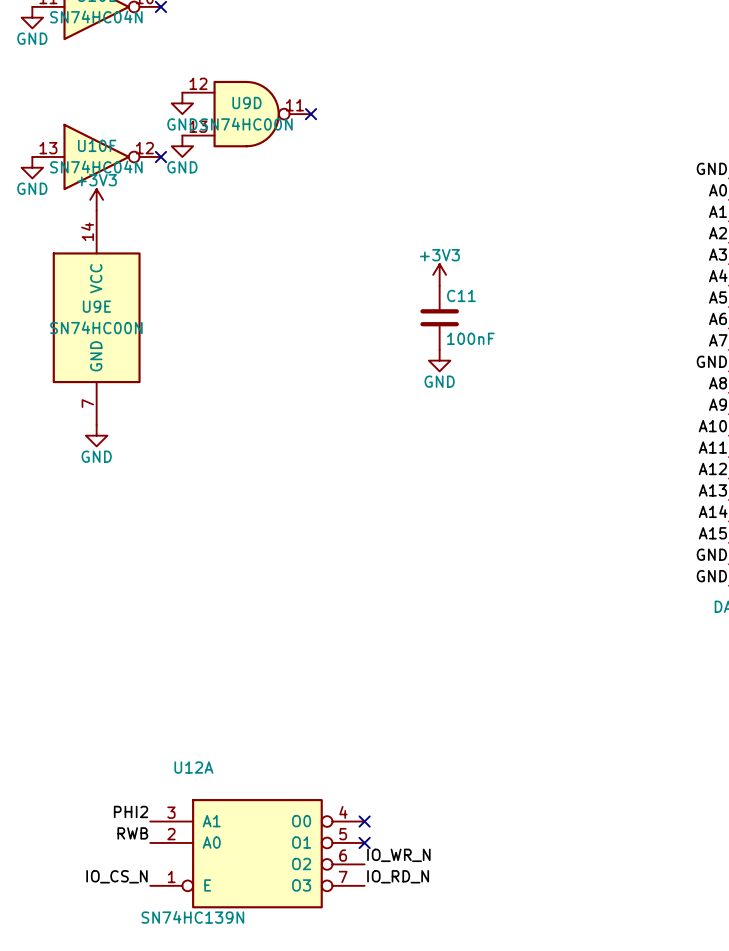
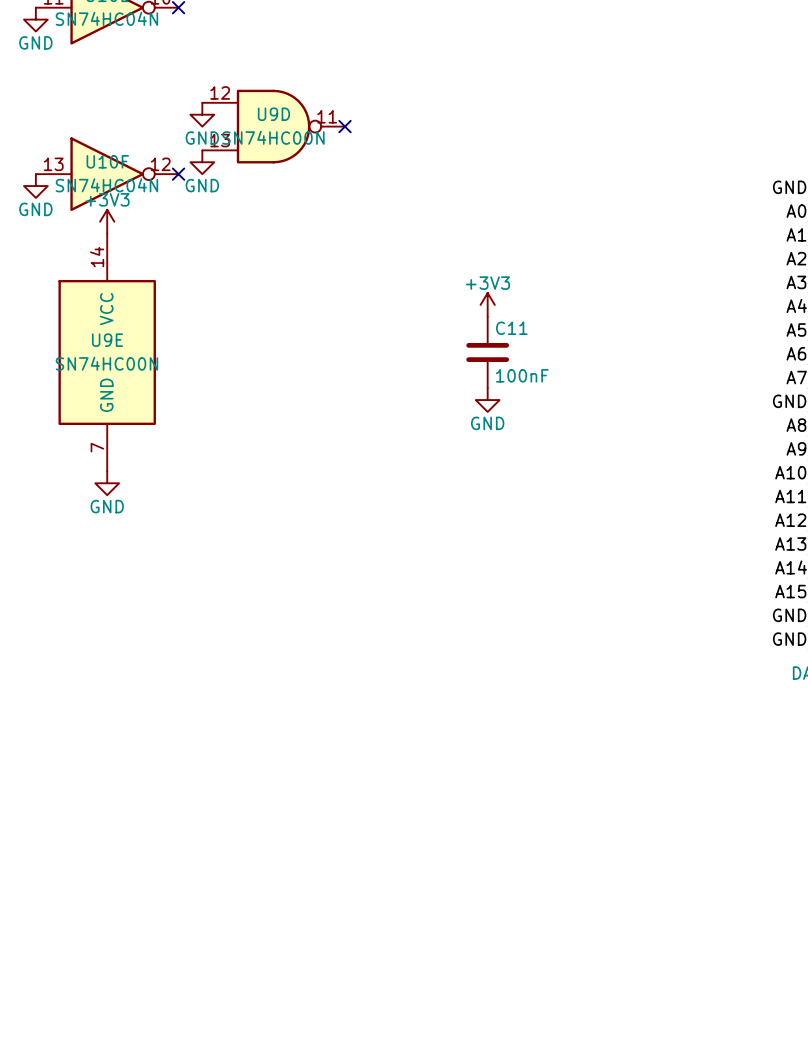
label: PHI2 (131, 811) -> none
no-connect mark: (364, 821) -> none
label: RWB (132, 833) -> none
no-connect mark: (364, 842) -> none
U12A: SN74HC139N (257, 853) -> none
label: IO_WR_N (398, 855) -> none
label: IO_CS_N (116, 876) -> none
label: IO_RD_N (398, 876) -> none

